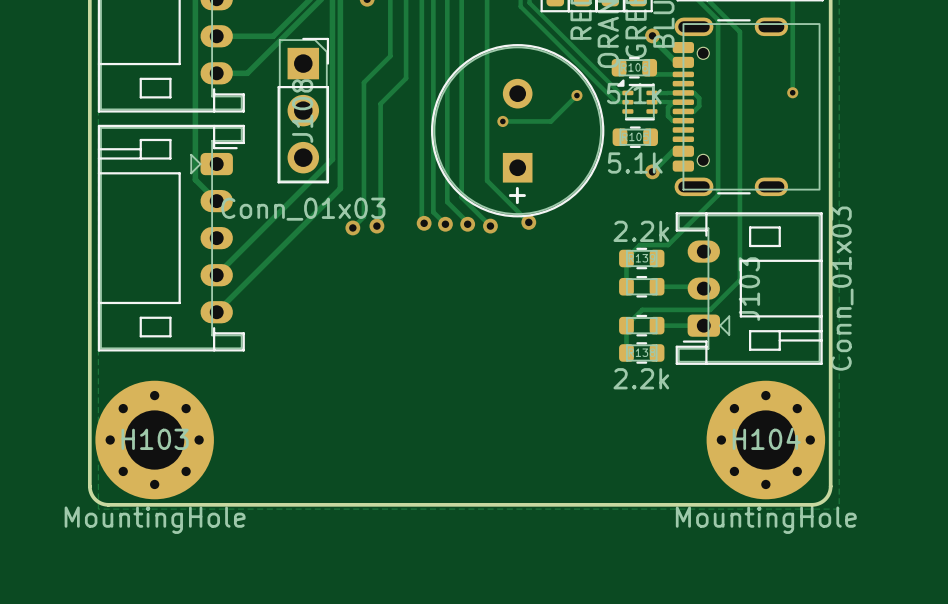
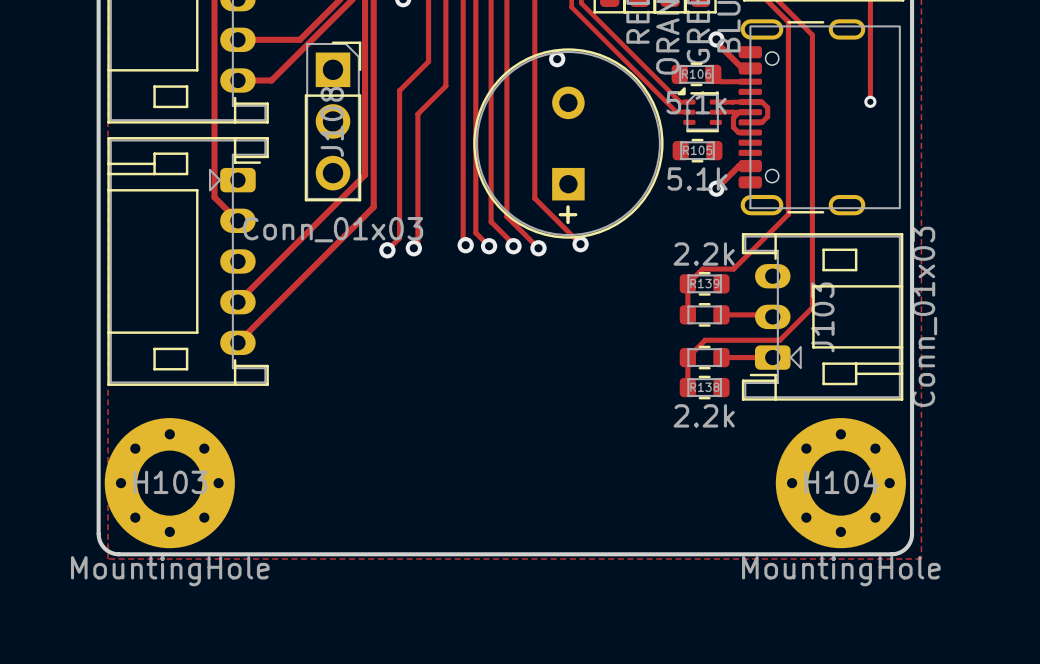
via: none -> (557, 59)
track: (576, 95) (551, 121) (502, 121) -> none
via: (576, 95) -> none
via: (502, 121) -> none

